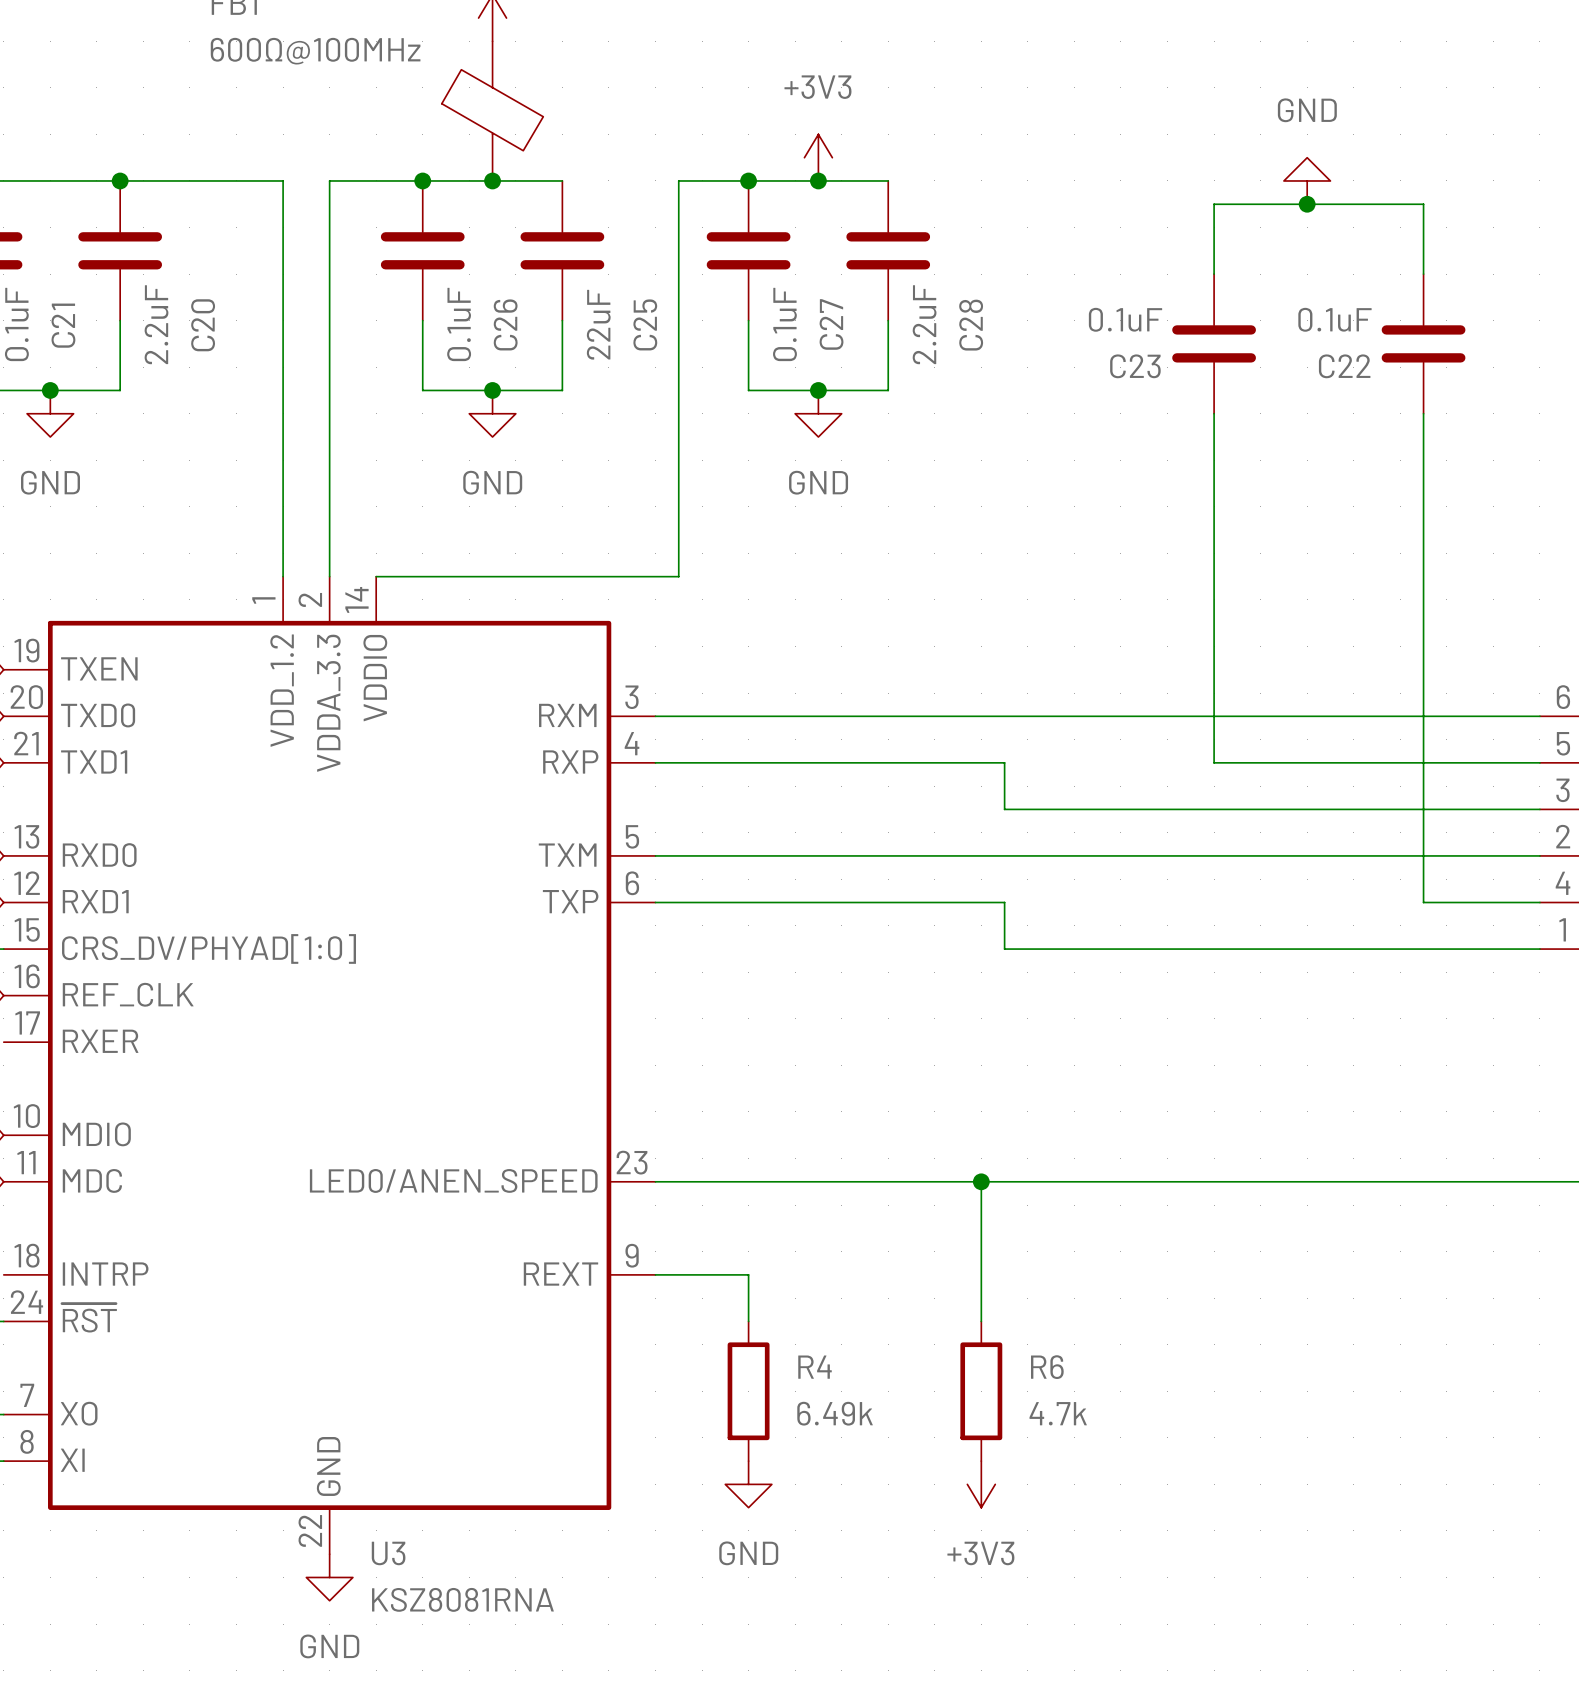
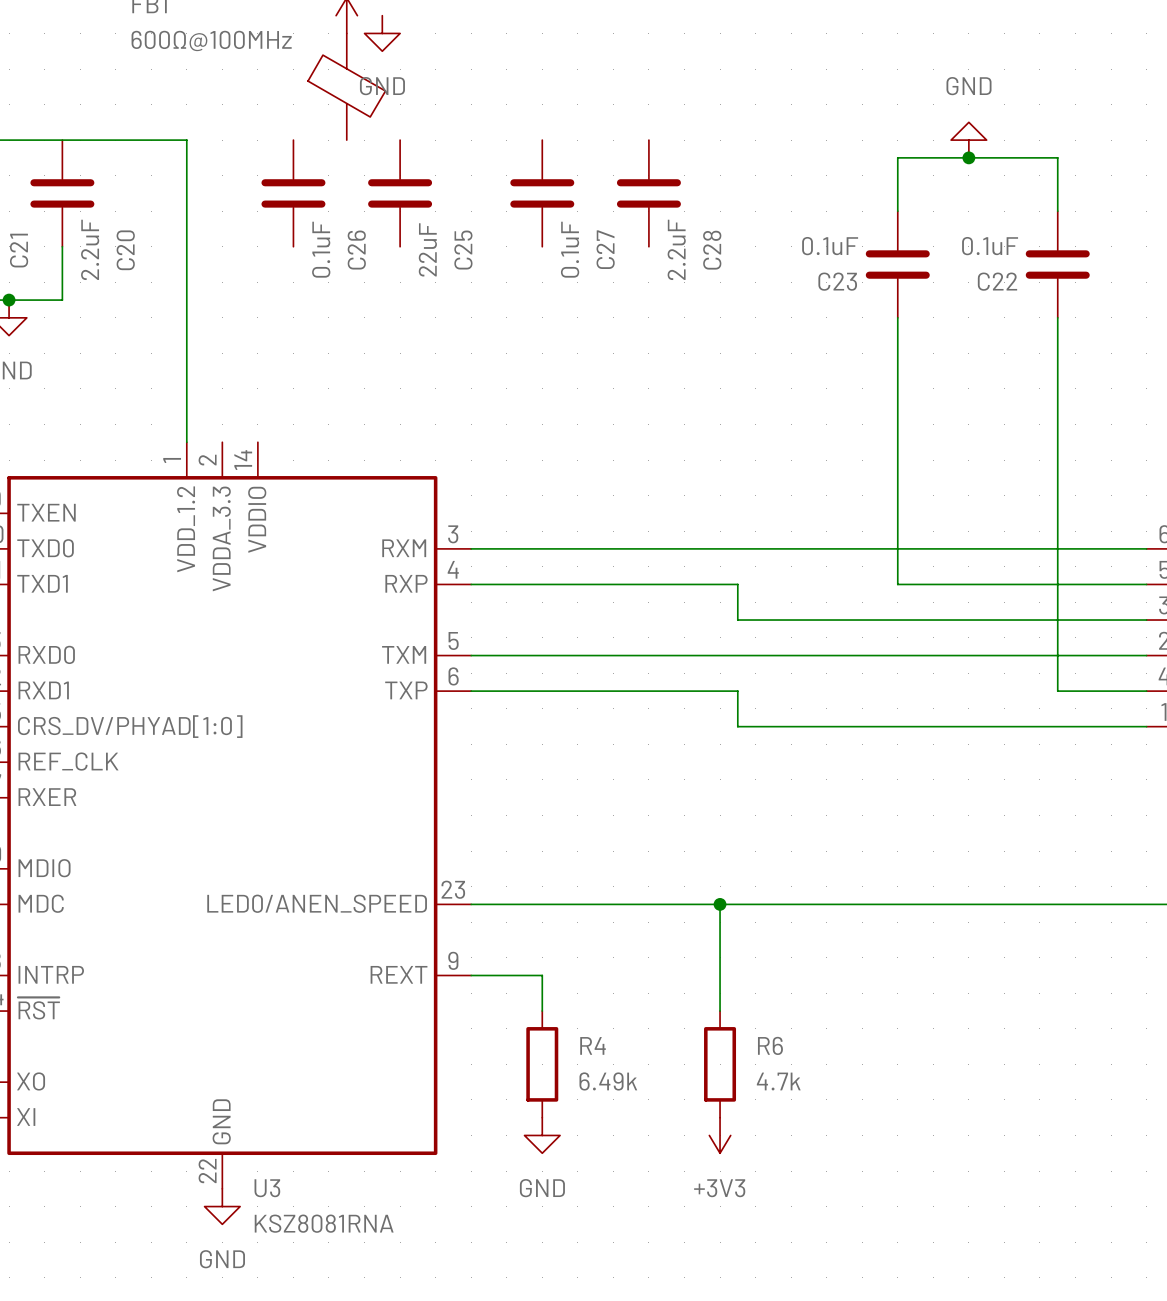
power symbol: none -> GND (382, 33)
power symbol: +3V3 (818, 157) -> none
junction: (120, 180) -> none
junction: (422, 180) -> none
junction: (492, 180) -> none
wire: (562, 180) (329, 180) (329, 576) -> none
junction: (748, 180) -> none
junction: (818, 180) -> none
wire: (888, 180) (678, 180) (678, 576) (376, 576) -> none
wire: (422, 320) (422, 390) (562, 390) (562, 320) -> none
wire: (748, 320) (748, 390) (888, 390) (888, 320) -> none
junction: (492, 390) -> none
junction: (818, 390) -> none
power symbol: GND (492, 413) -> none
power symbol: GND (818, 413) -> none

